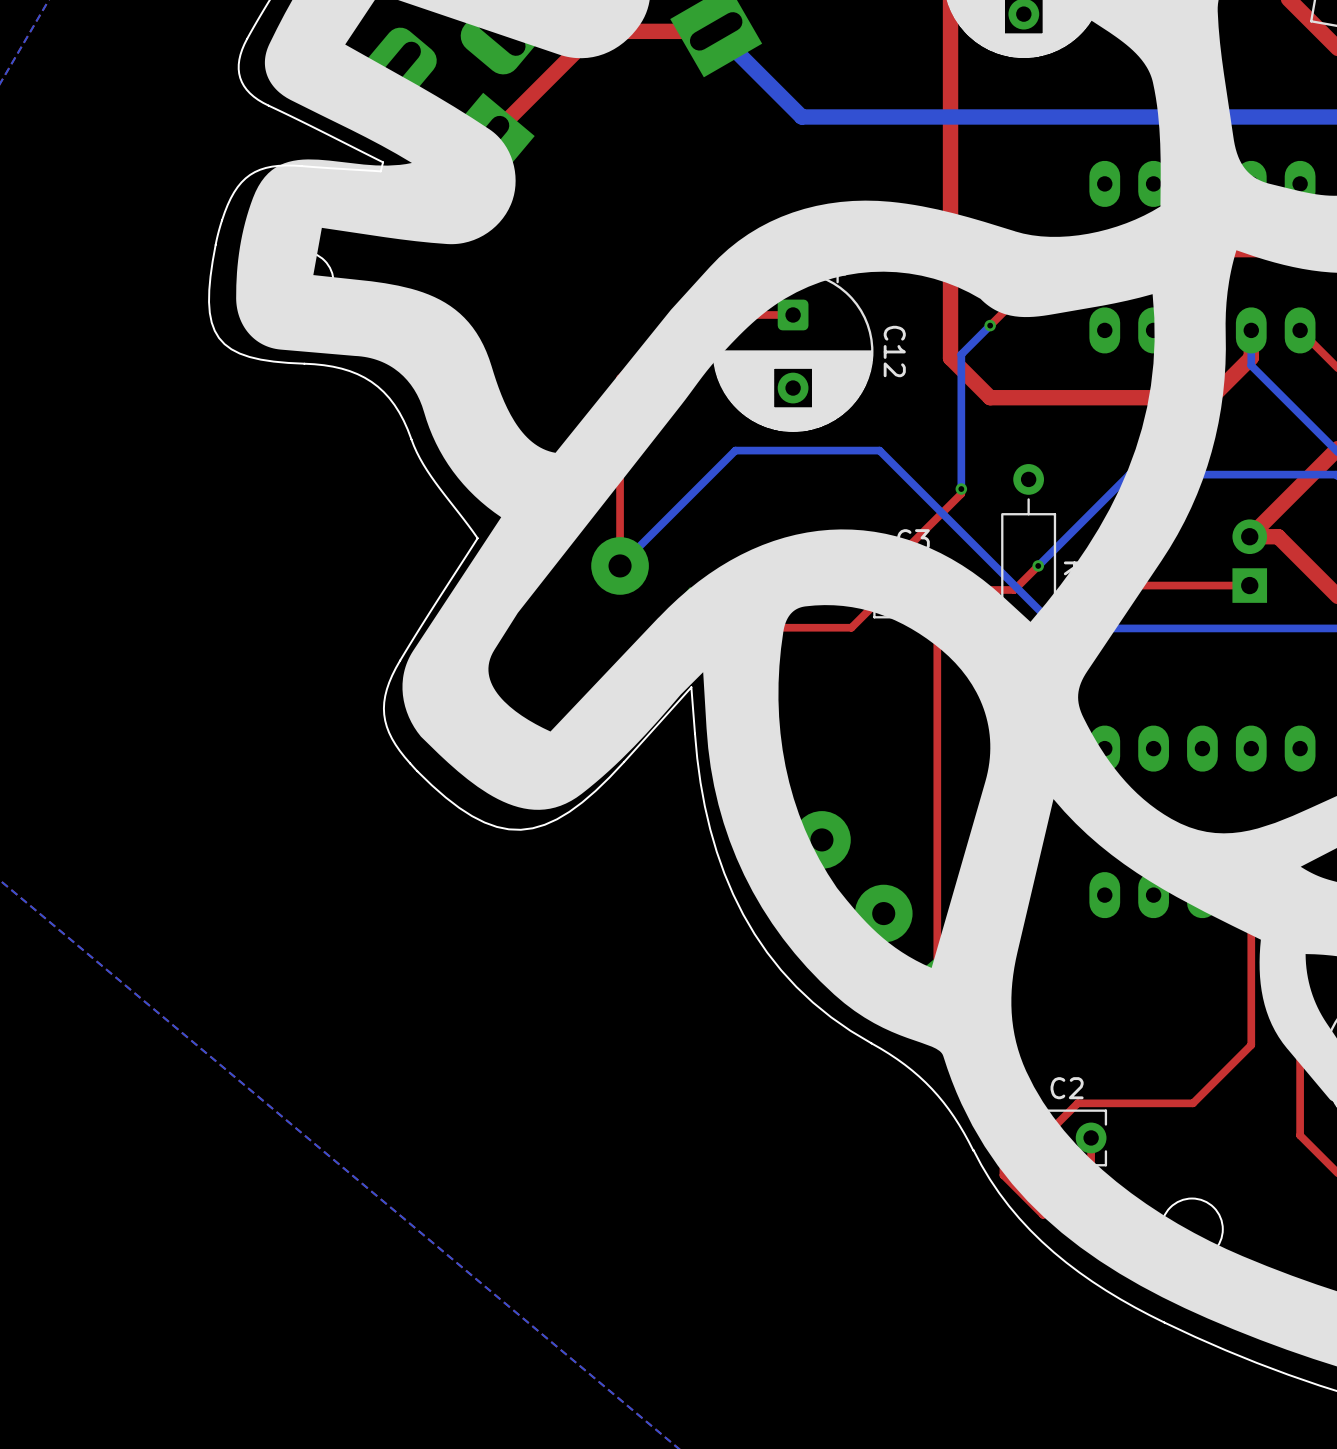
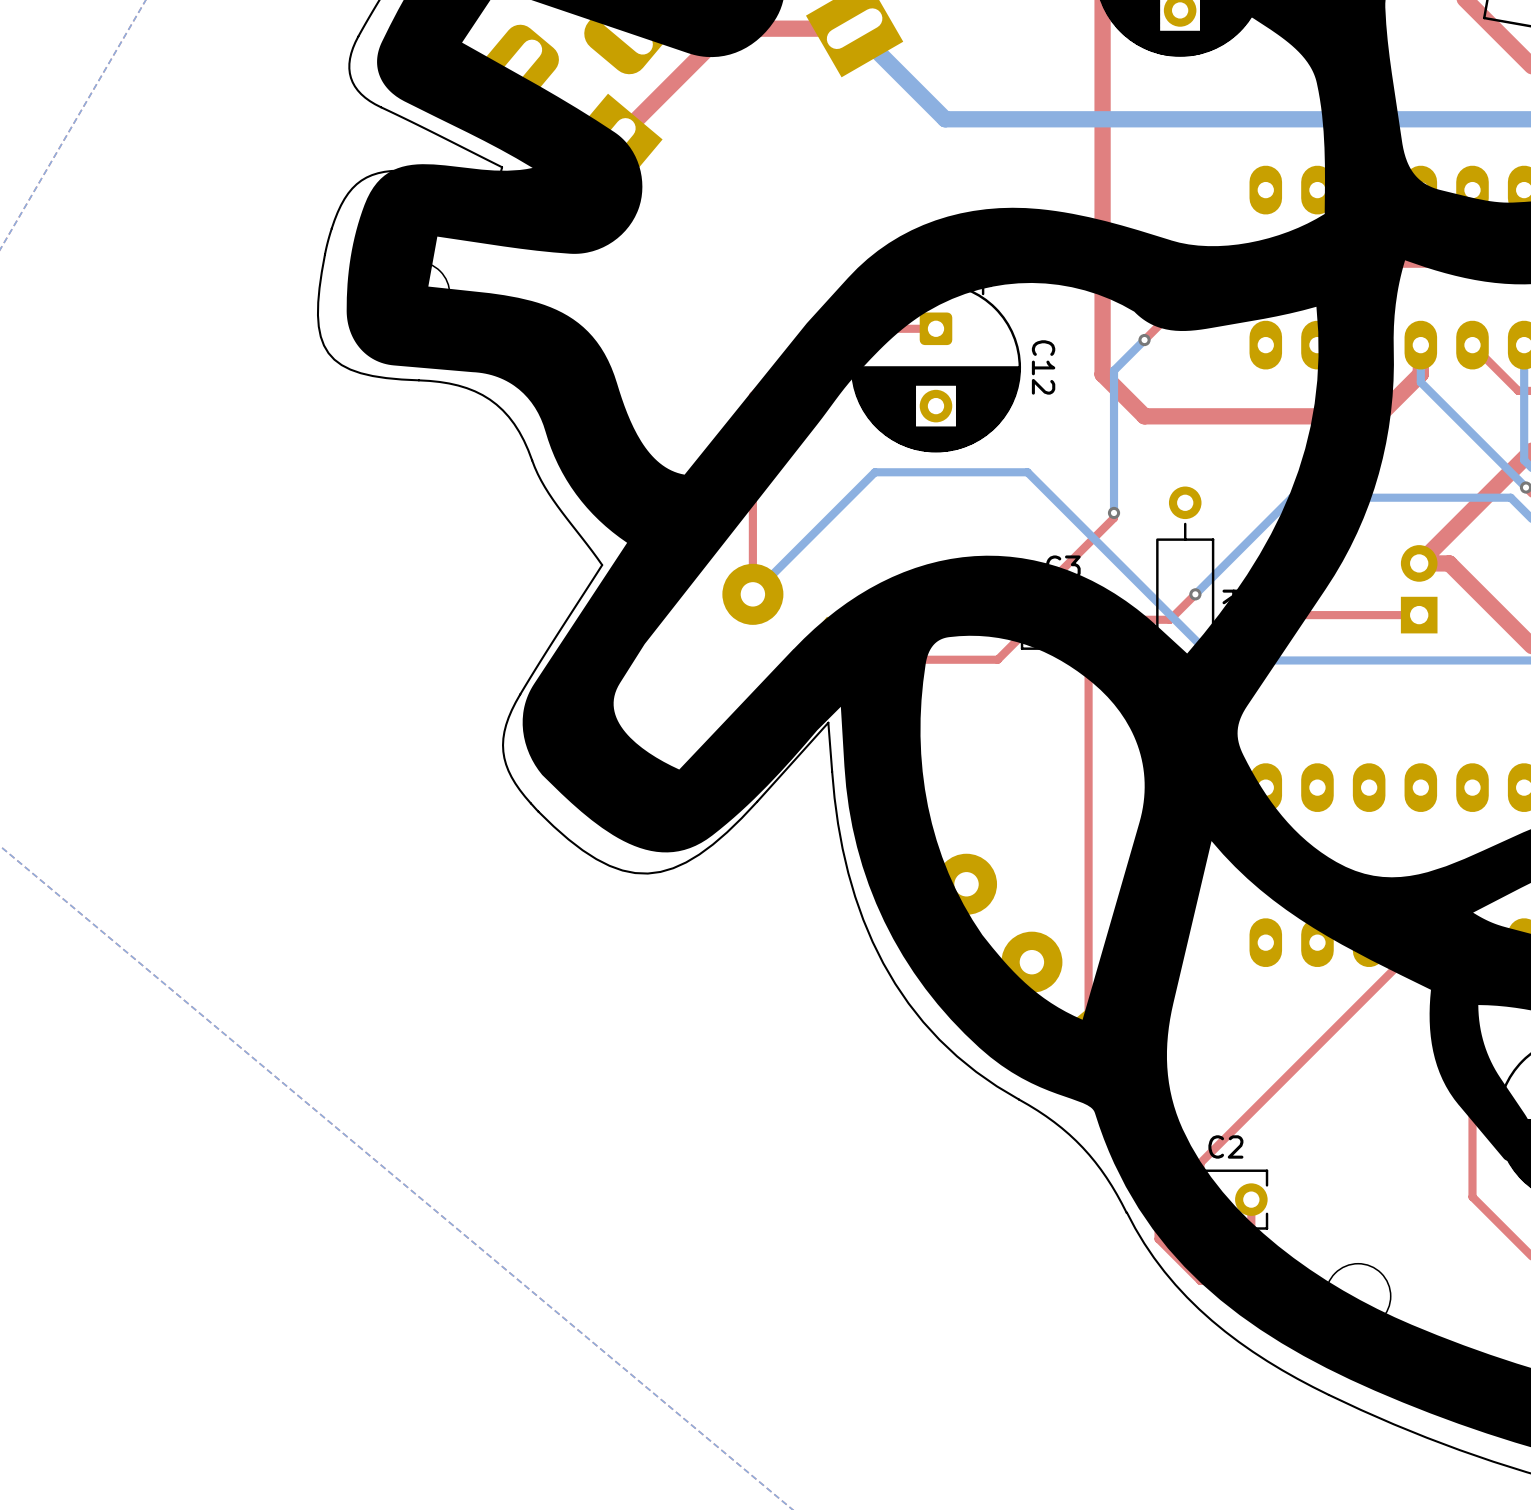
top track: (1251, 895) (1251, 1045) (1193, 1103) (1077, 1103) (1043, 1137) -> (1420, 942) (1200, 1163) (1200, 1199)

